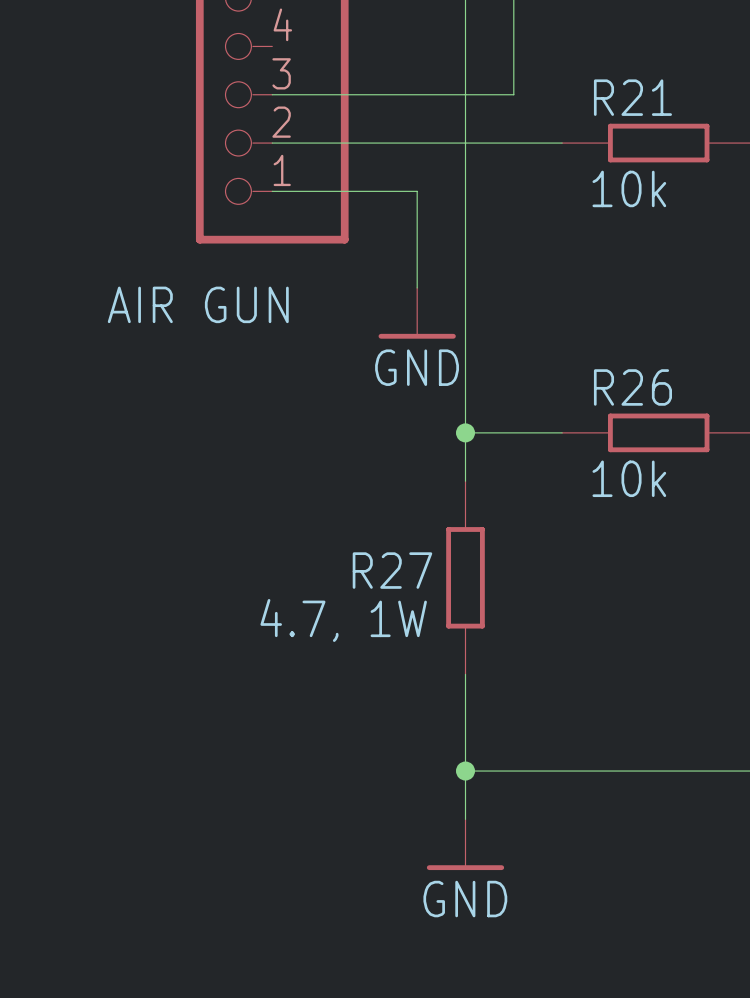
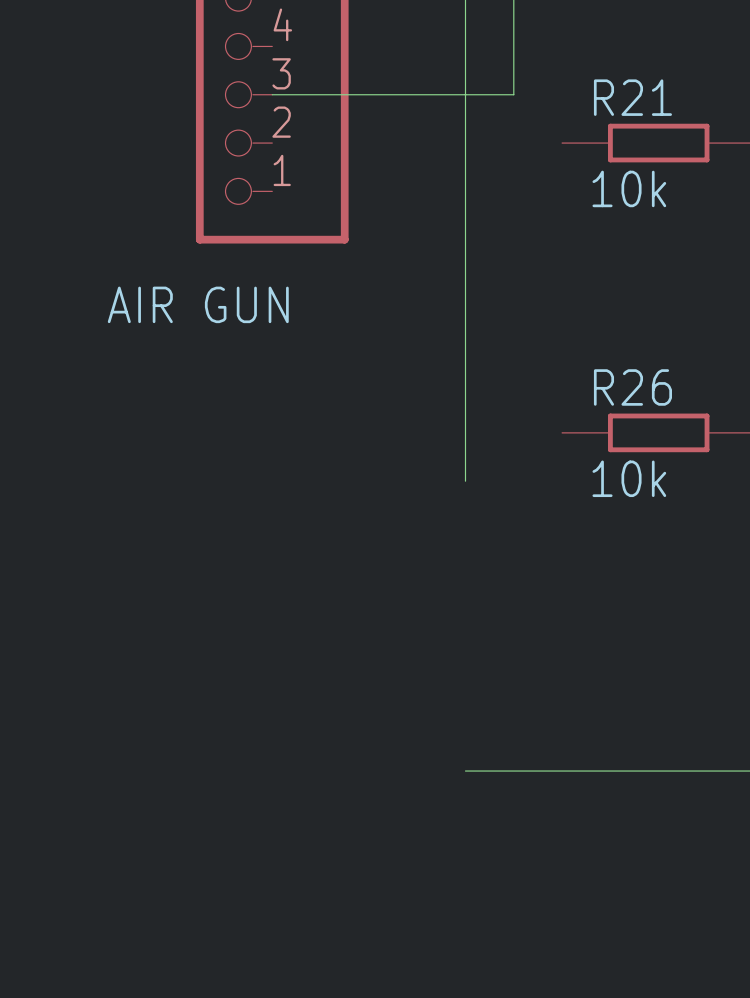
wire: (272, 143) (562, 143) -> none
wire: (272, 191) (417, 191) (417, 287) -> none
power symbol: GND (417, 313) -> none
wire: (465, 432) (562, 432) -> none
junction: (465, 432) -> none
R27: 4.7, 1W (465, 577) -> none
wire: (465, 674) (465, 819) -> none
junction: (465, 771) -> none
power symbol: GND (465, 844) -> none

